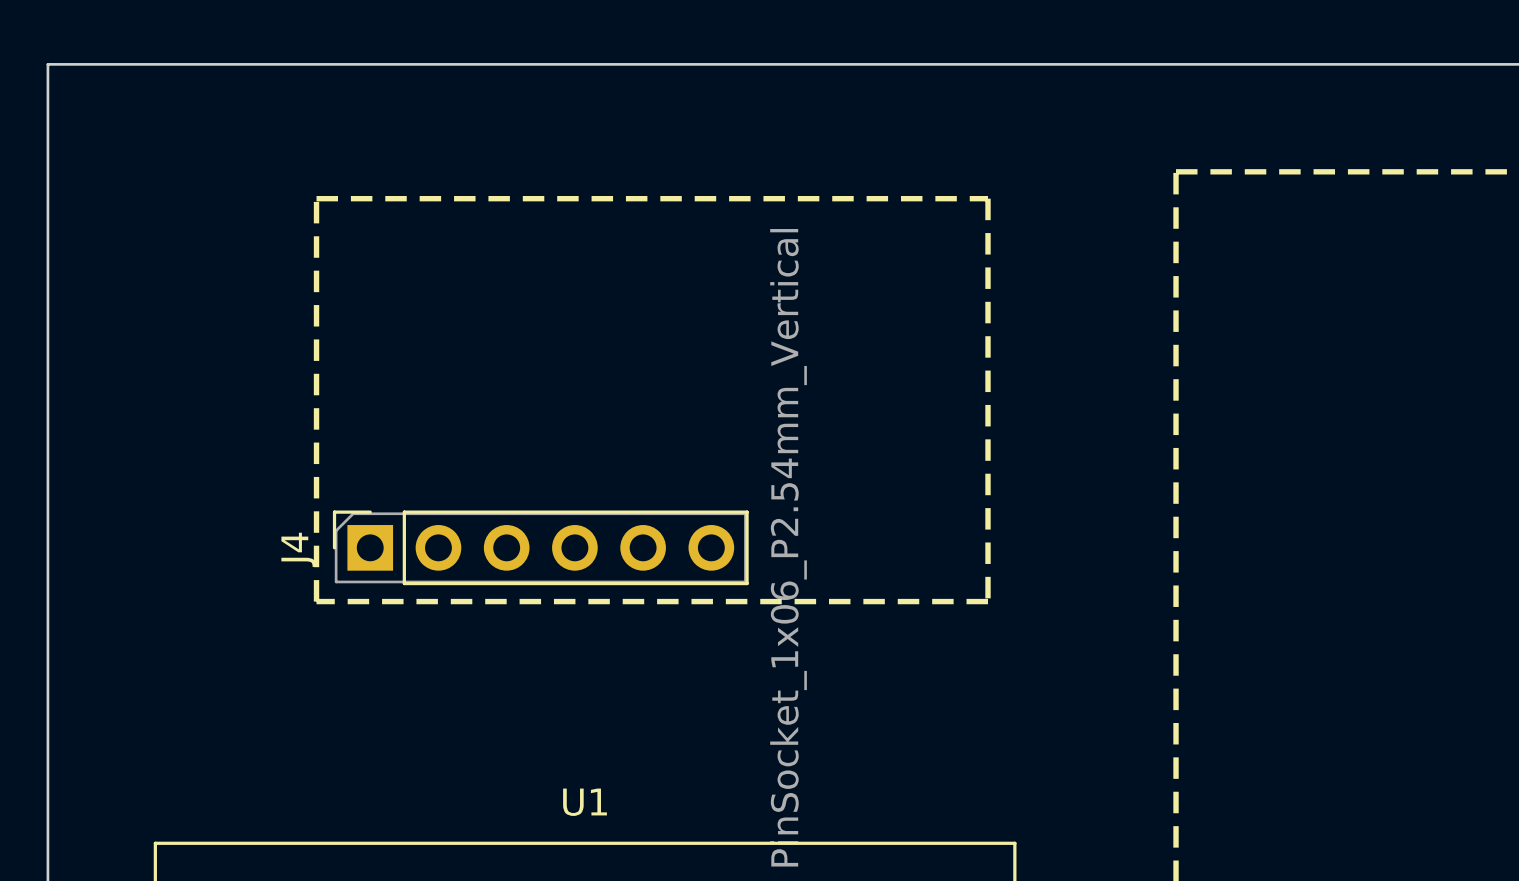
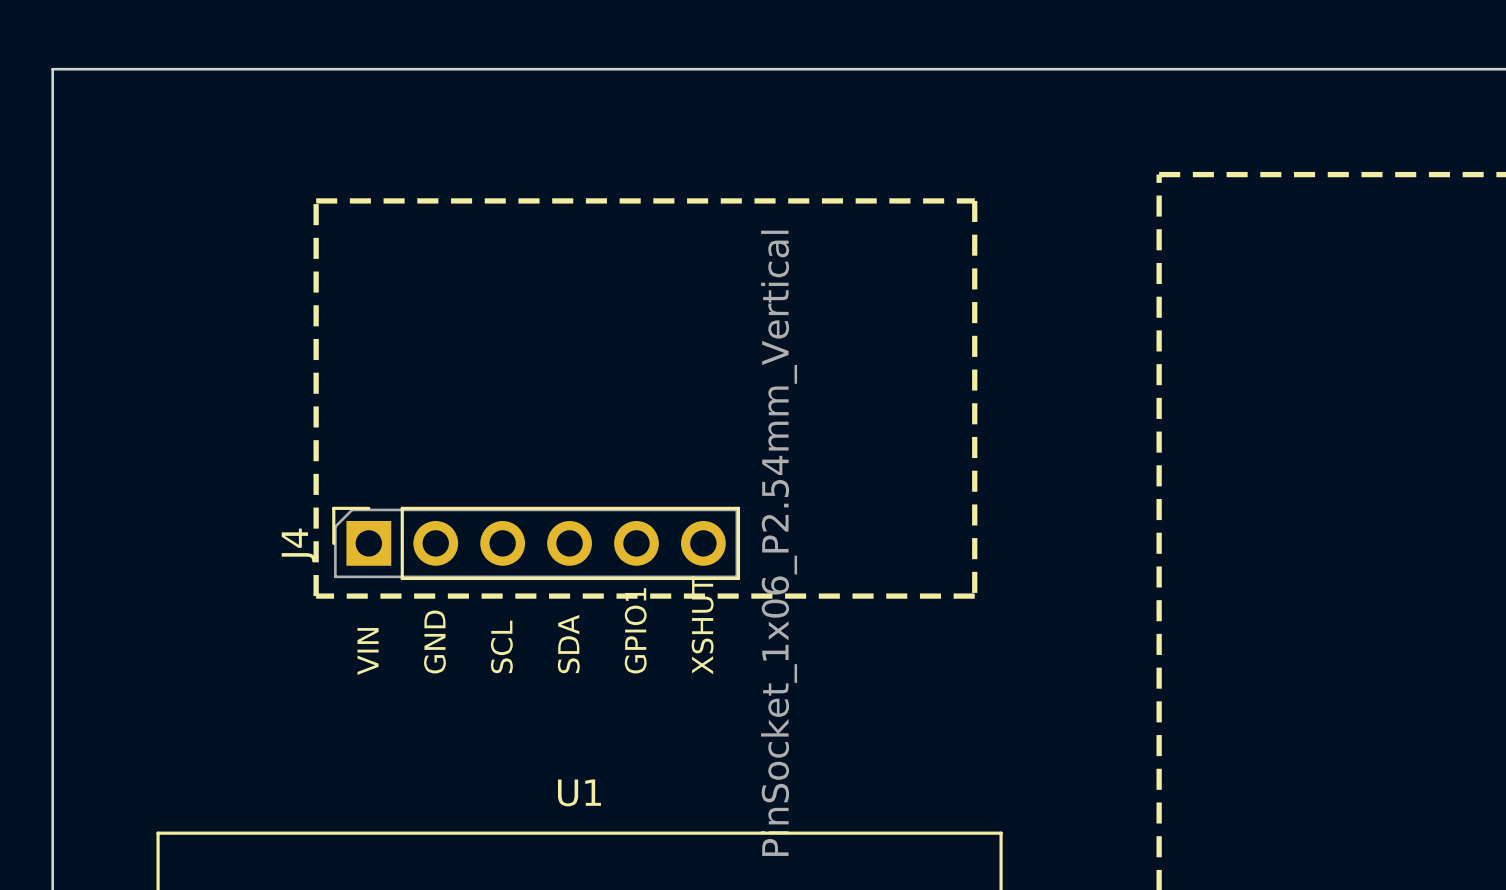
text: none -> XSHUT (702, 625)
text: none -> GPIO1 (635, 630)
text: none -> GND (434, 642)
text: none -> SDA (568, 644)
text: none -> SCL (501, 646)
text: none -> VIN (368, 651)

